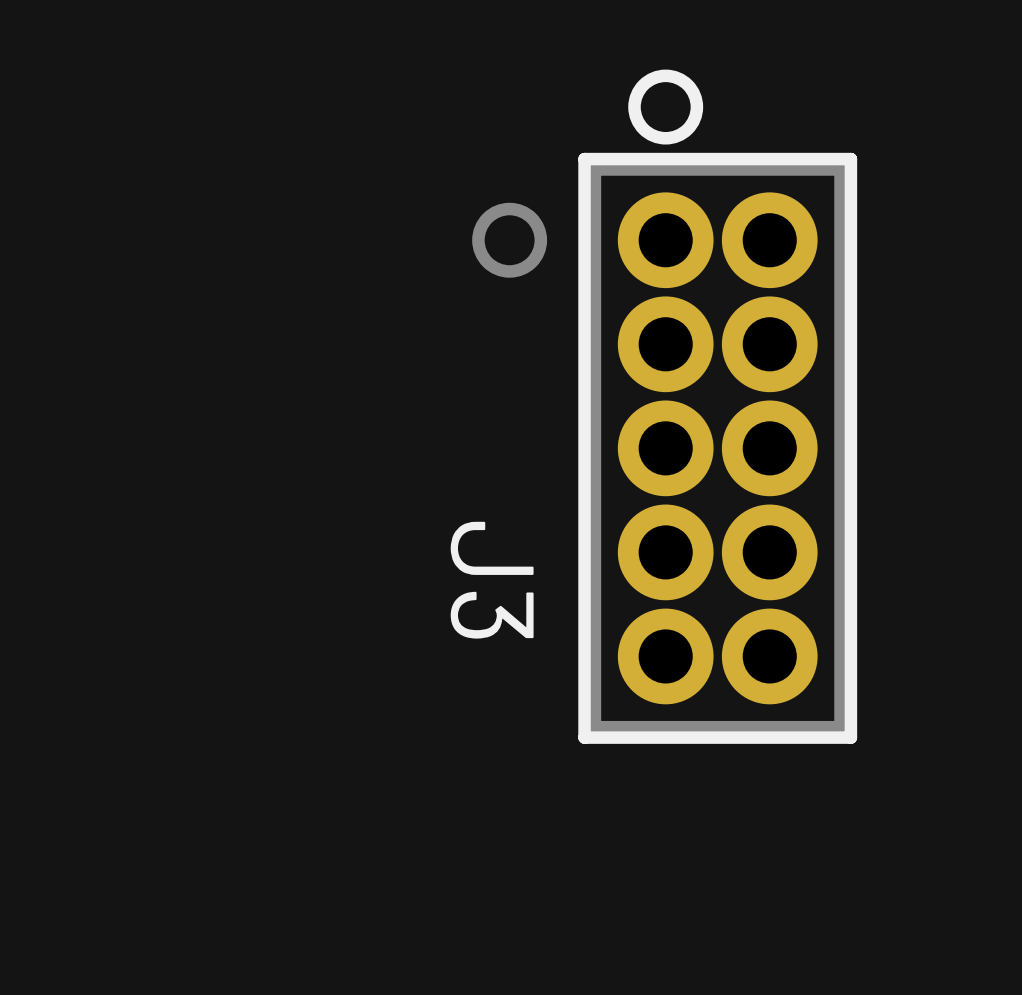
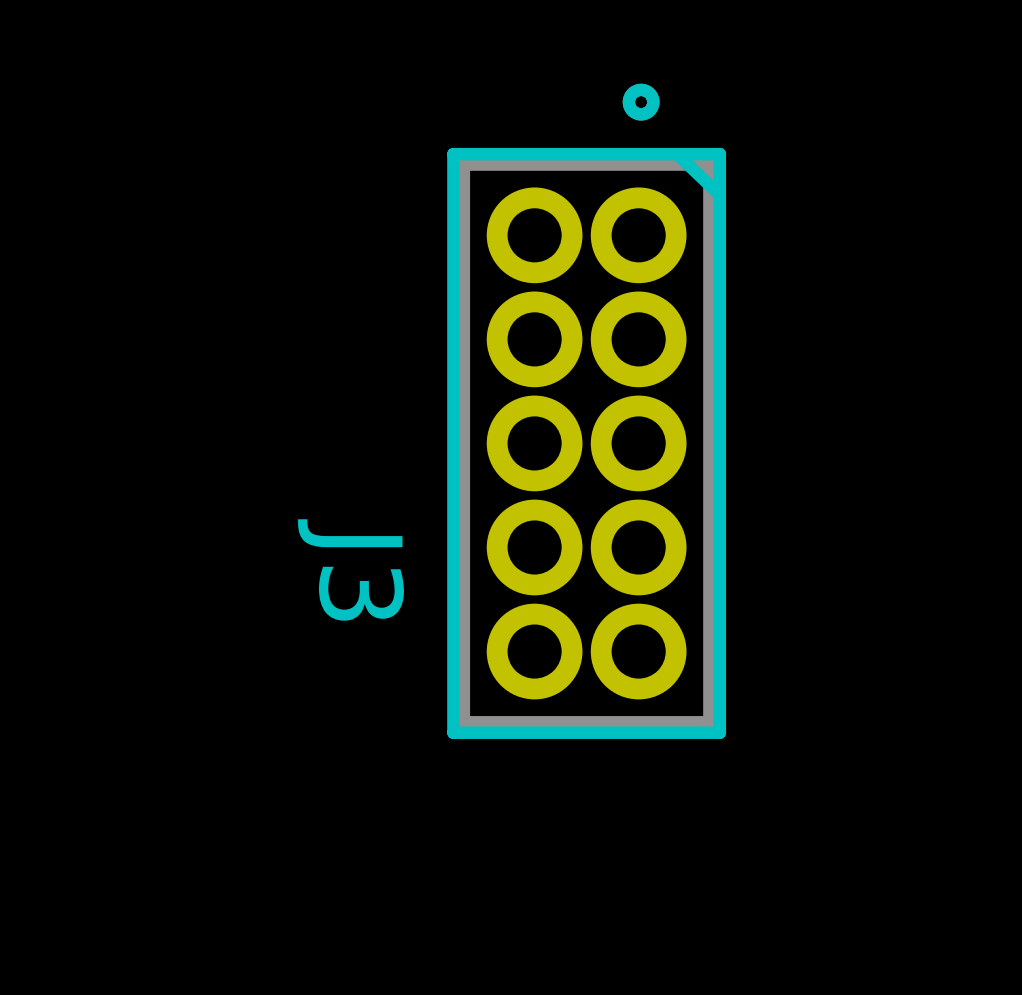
J3 footprint: [472, 69, 858, 744] -> [447, 83, 727, 739]

